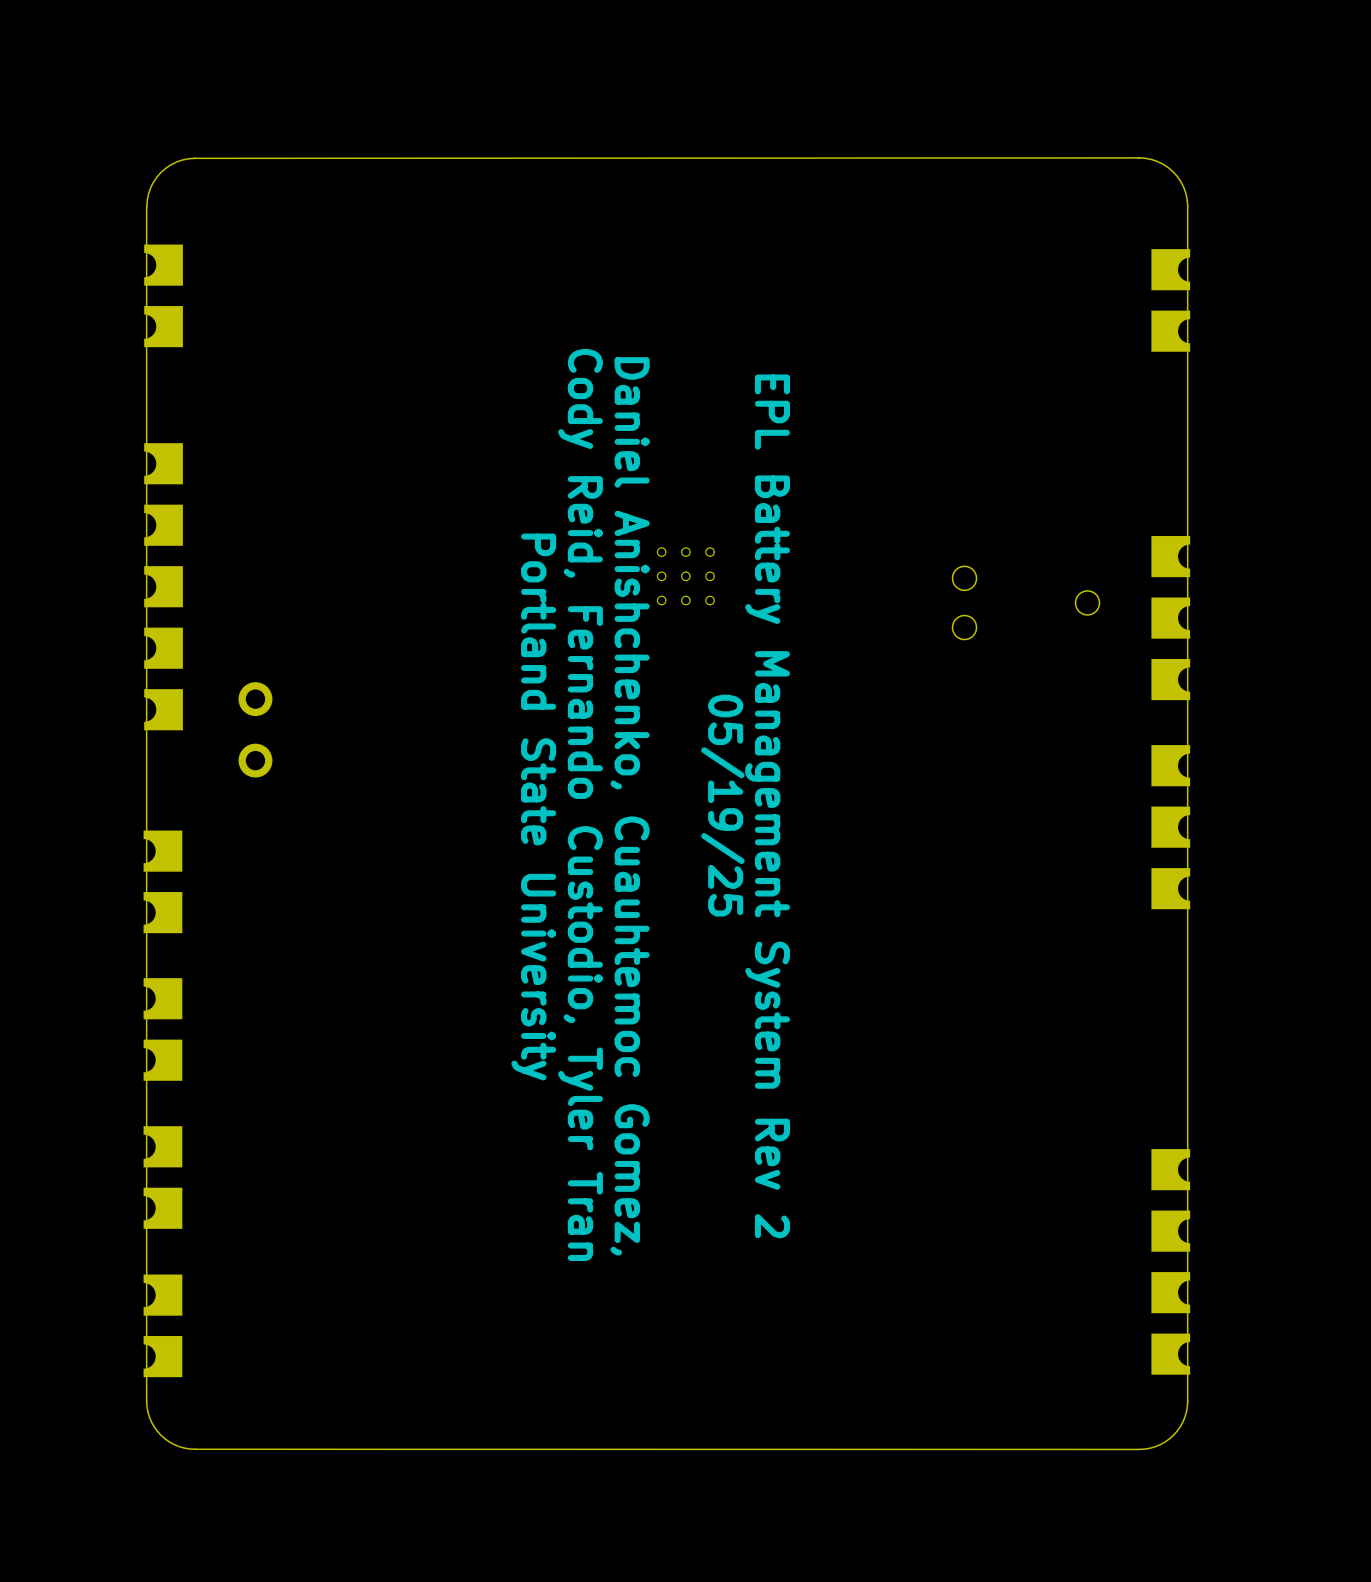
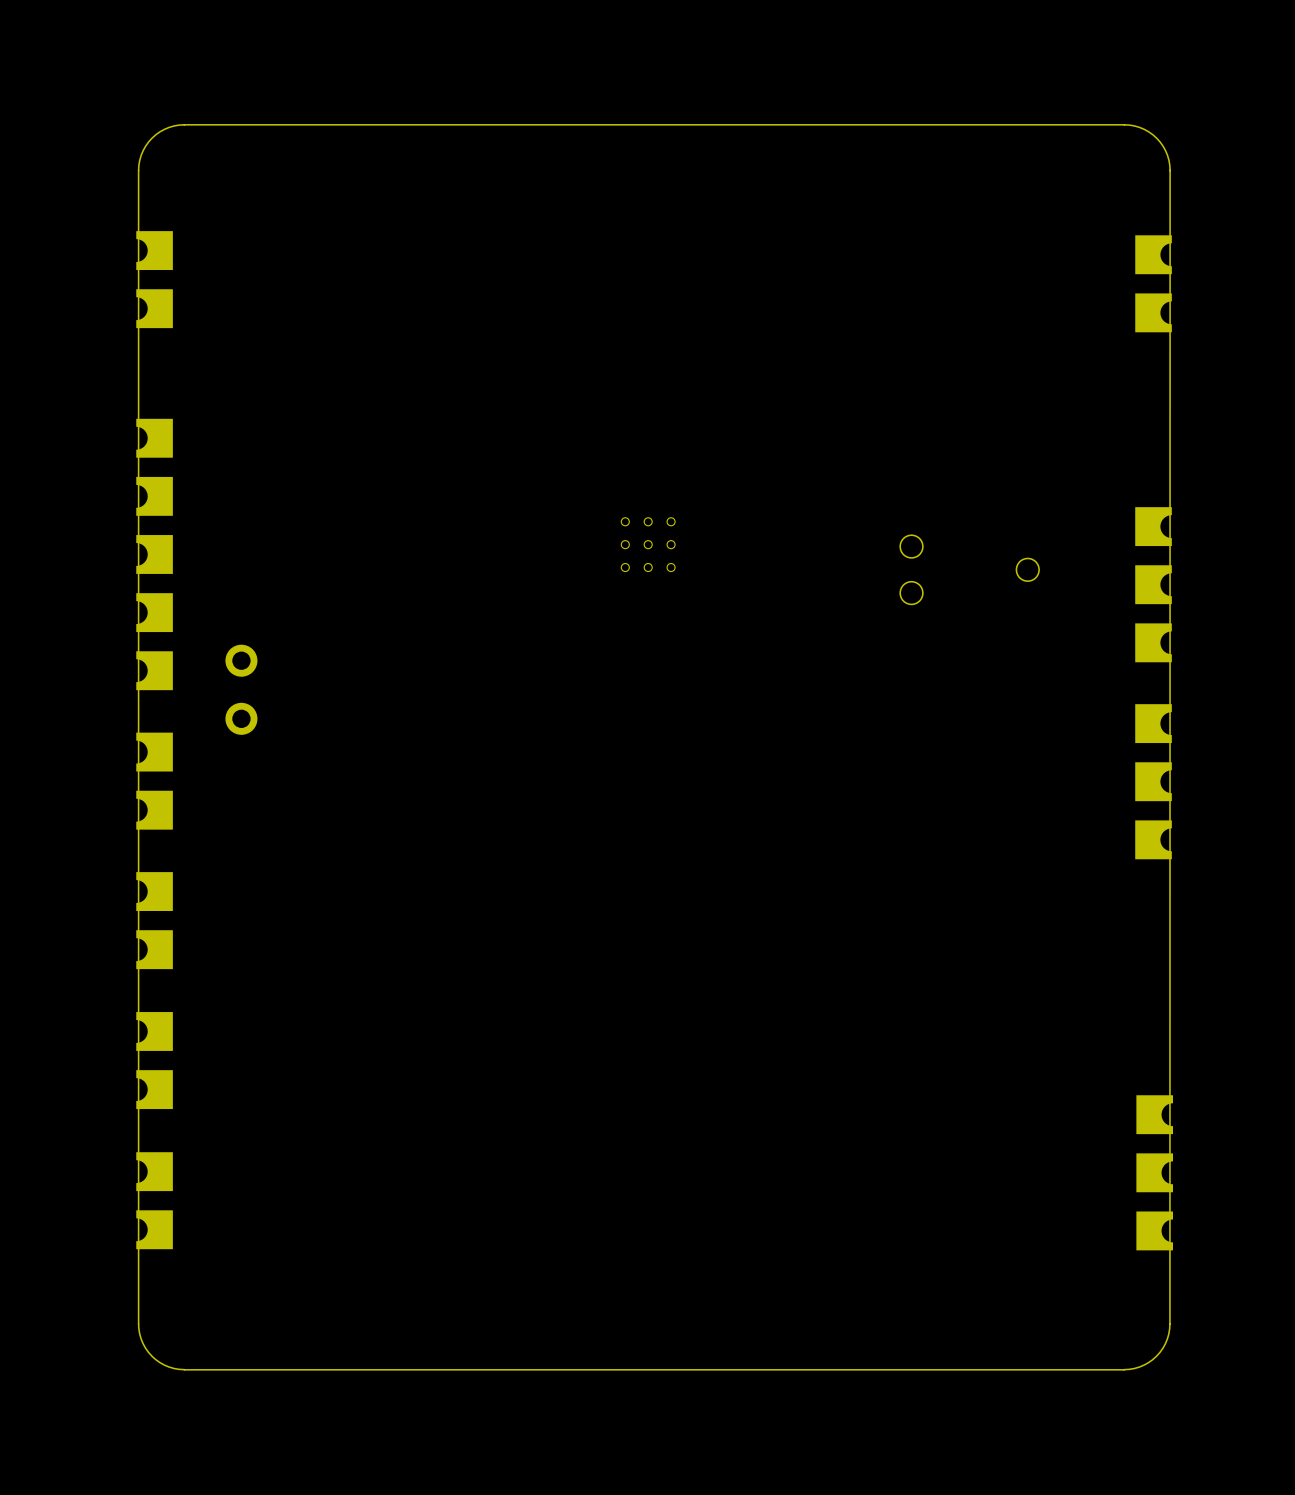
board edge: (1139, 157) (194, 158) -> none
board edge: (1139, 157) (1157, 161) (1173, 171) (1183, 187) (1187, 205) (1187, 1400) (1182, 1421) (1173, 1435) (1160, 1444) (1139, 1449) -> none
board edge: (195, 158) (176, 162) (160, 172) (150, 188) (146, 206) -> (1170, 170) (1167, 155) (1156, 138) (1139, 127) (1124, 124) (184, 124) (169, 127) (160, 131) (145, 146) (138, 165) (138, 195)
board edge: none -> (1170, 170) (1169, 1323) (1167, 1339) (1156, 1356) (1144, 1365) (1124, 1369)
part position: (1176, 300) -> (1159, 283)
part position: (1176, 618) -> (1159, 584)
text: Cody Reid, Fernando Custodio, Tyler Tran (580, 804) -> none
text: 05/19/25 (722, 805) -> none
text: Daniel Anishchenko, Cuauhtemoc Gomez, (630, 806) -> none
text: EPL Battery Management System Rev 2 (767, 806) -> none
text: Portland State University (533, 807) -> none
part: none -> (148, 781)
part position: (1176, 827) -> (1159, 781)
part: (156, 881) -> none
part: none -> (148, 920)
part: (156, 1029) -> none
part: none -> (148, 1060)
part: (156, 1177) -> none
part: none -> (1160, 1172)
part: (1176, 1261) -> none
part: none -> (148, 1200)
part: (156, 1325) -> none
board edge: (195, 1449) (1139, 1449) -> (184, 1369) (1124, 1369)

